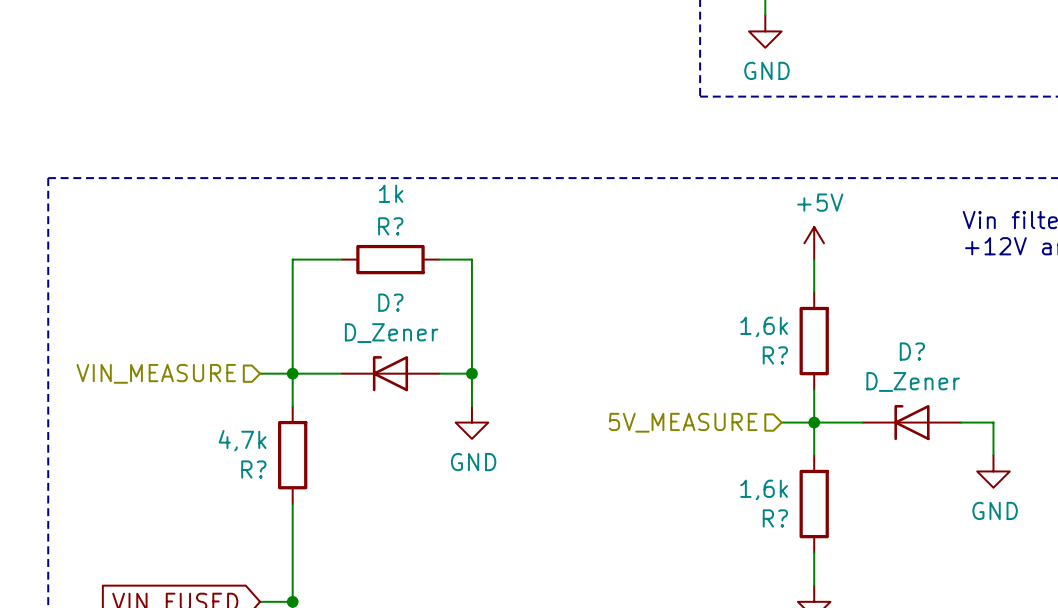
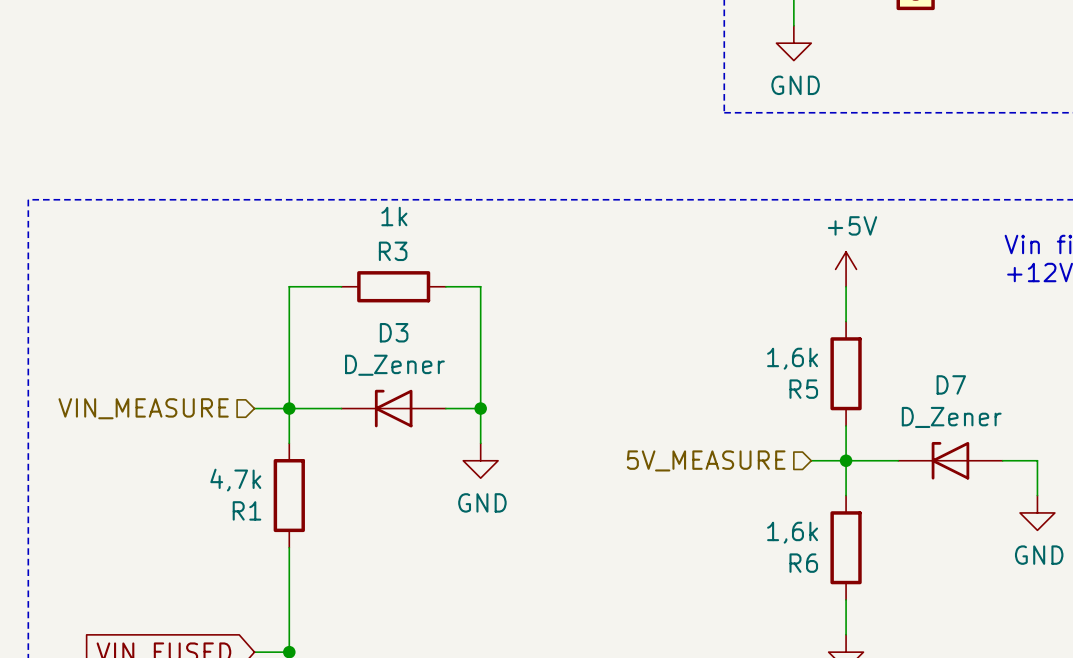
R? name: R? (390, 226) -> R3 (393, 251)
D? name: D? (390, 302) -> D3 (394, 332)
D? name: D? (912, 351) -> D7 (951, 384)
R? name: R? (775, 355) -> R5 (803, 389)
R? name: R? (253, 469) -> R1 (246, 510)
R? name: R? (775, 518) -> R6 (803, 563)

